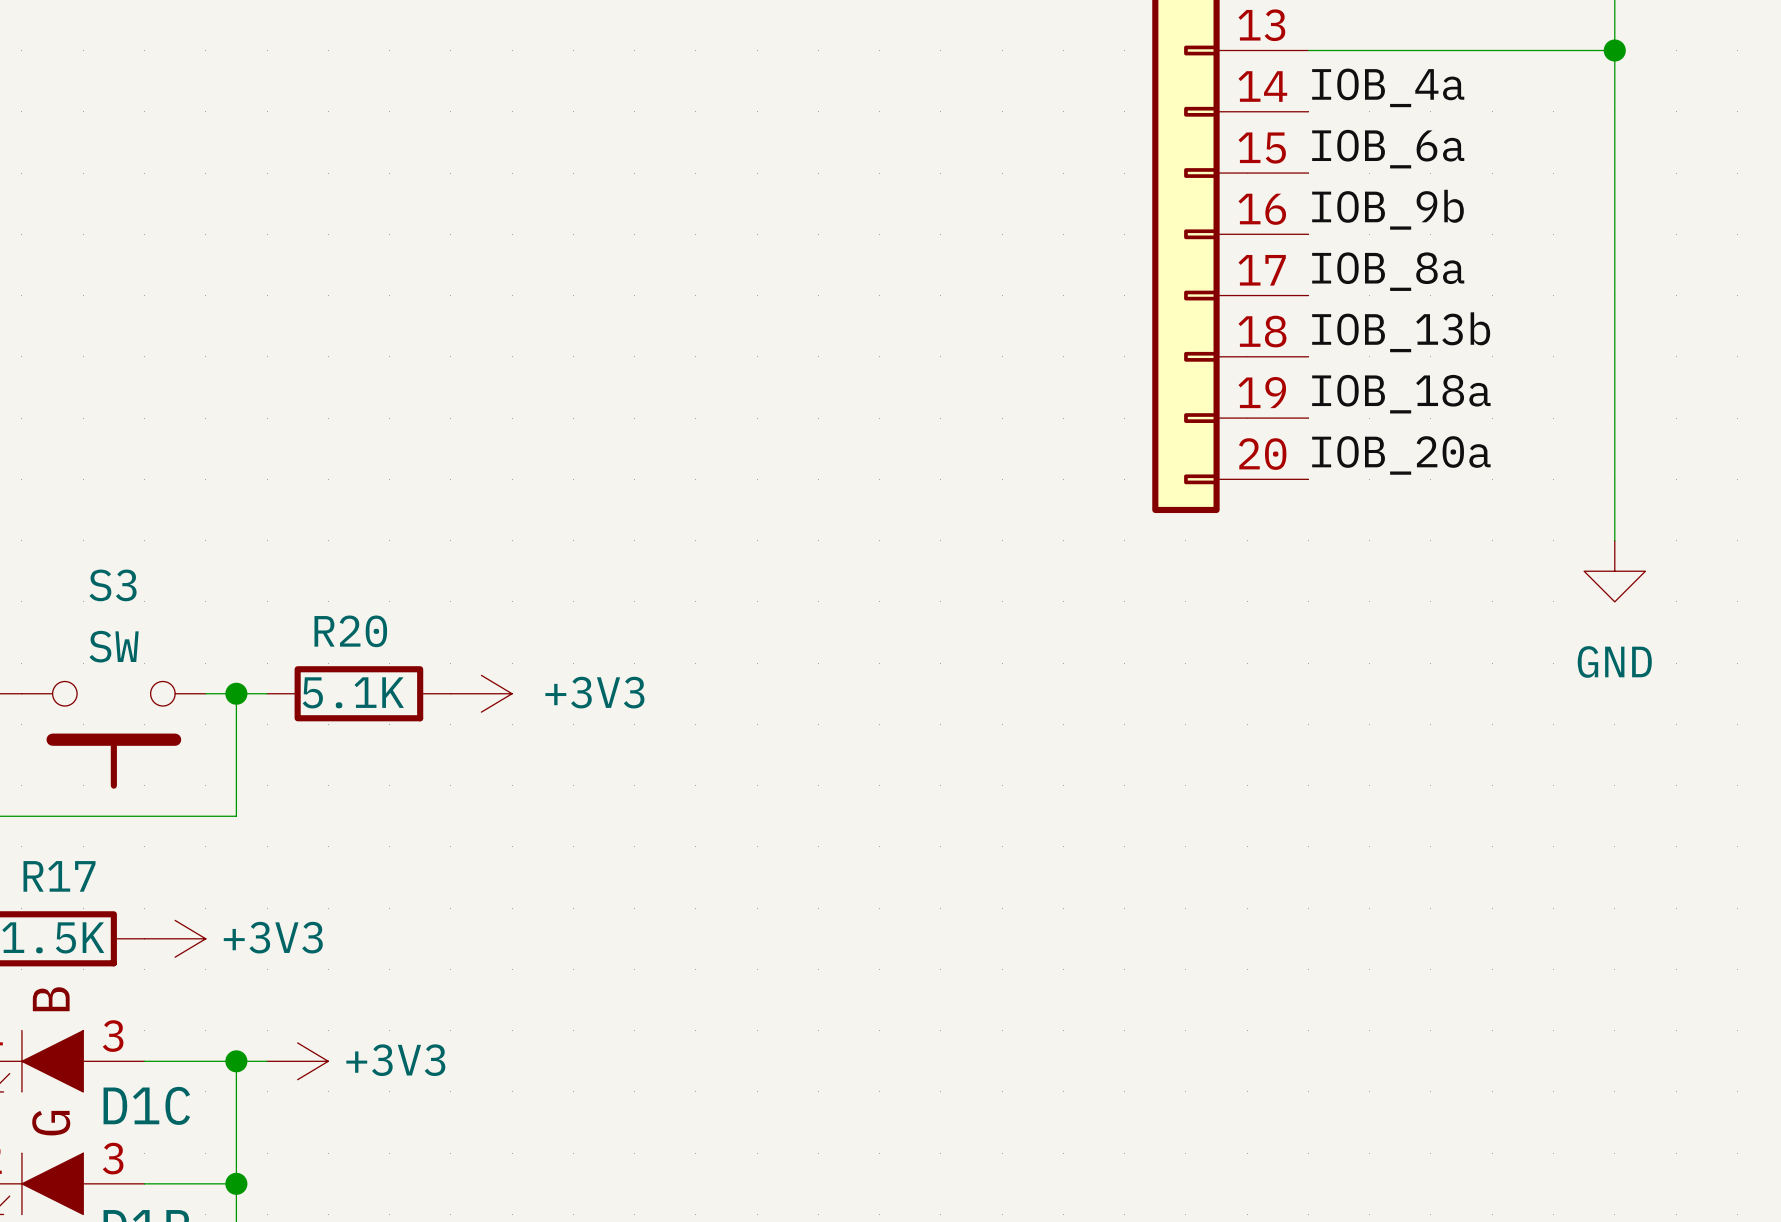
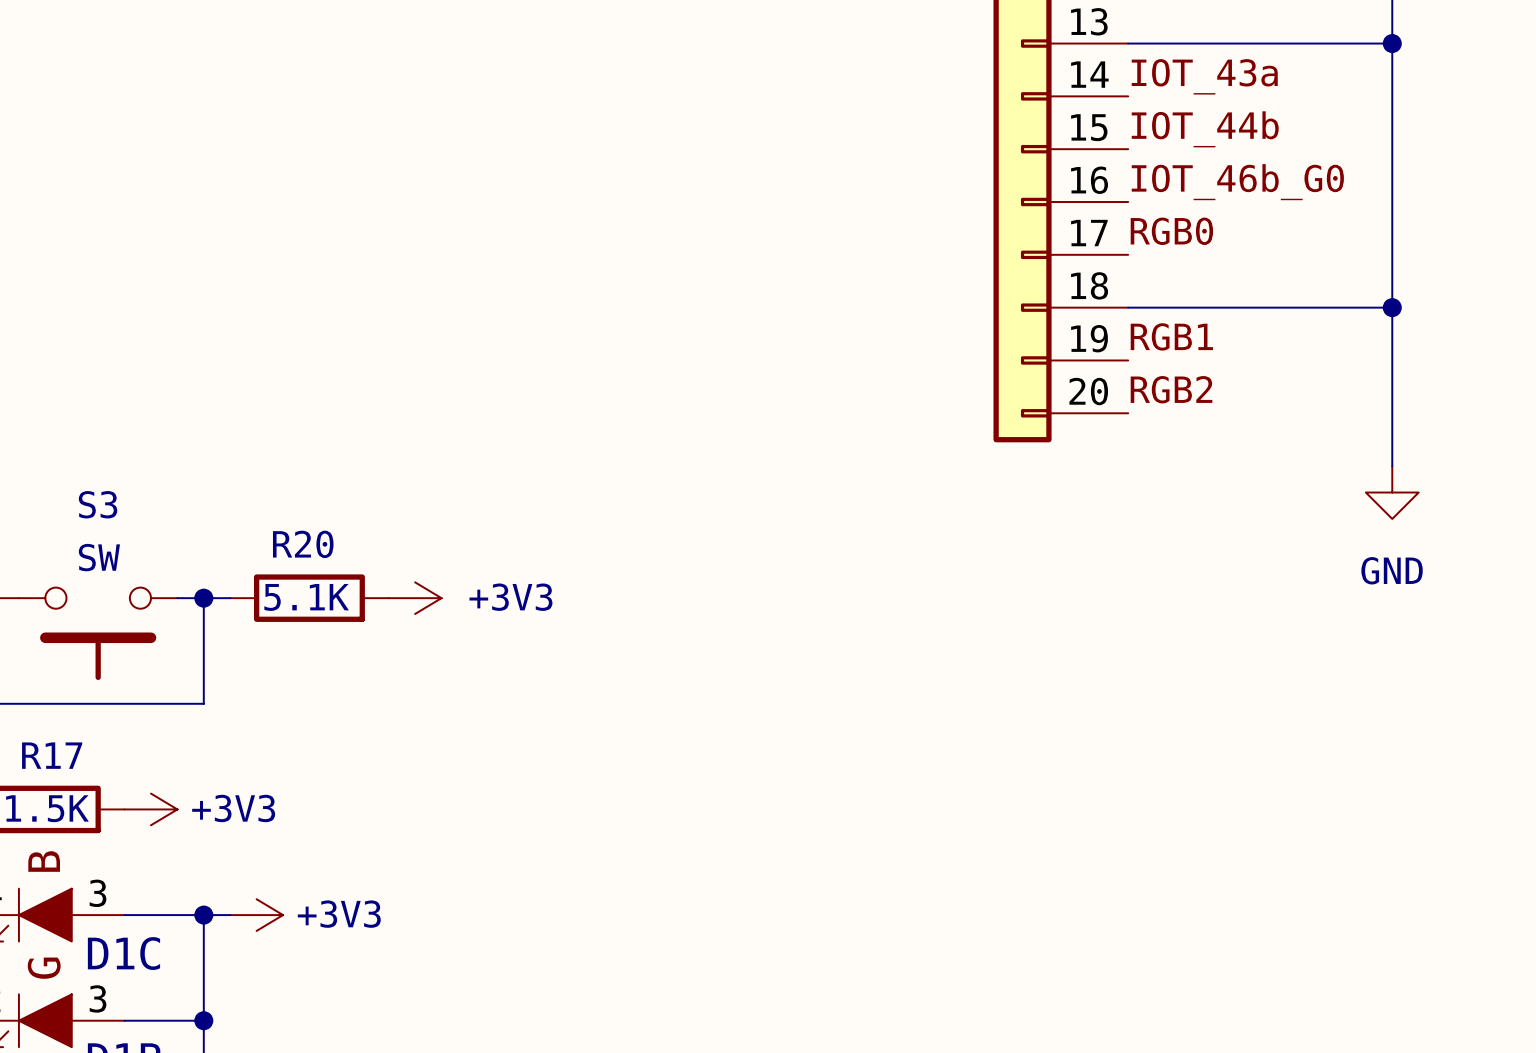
label: IOB_4a (1388, 87) -> IOT_43a (1204, 76)
label: IOB_6a (1388, 149) -> IOT_44b (1205, 129)
label: IOB_9b (1387, 209) -> IOT_46b_G0 (1237, 182)
label: IOB_8a (1388, 271) -> RGB0 (1171, 231)
label: IOB_13b (1401, 332) -> none
wire: none -> (1128, 307) (1392, 307)
junction: none -> (1392, 307)
label: IOB_18a (1401, 394) -> RGB1 (1171, 336)
label: IOB_20a (1401, 455) -> RGB2 (1171, 389)

